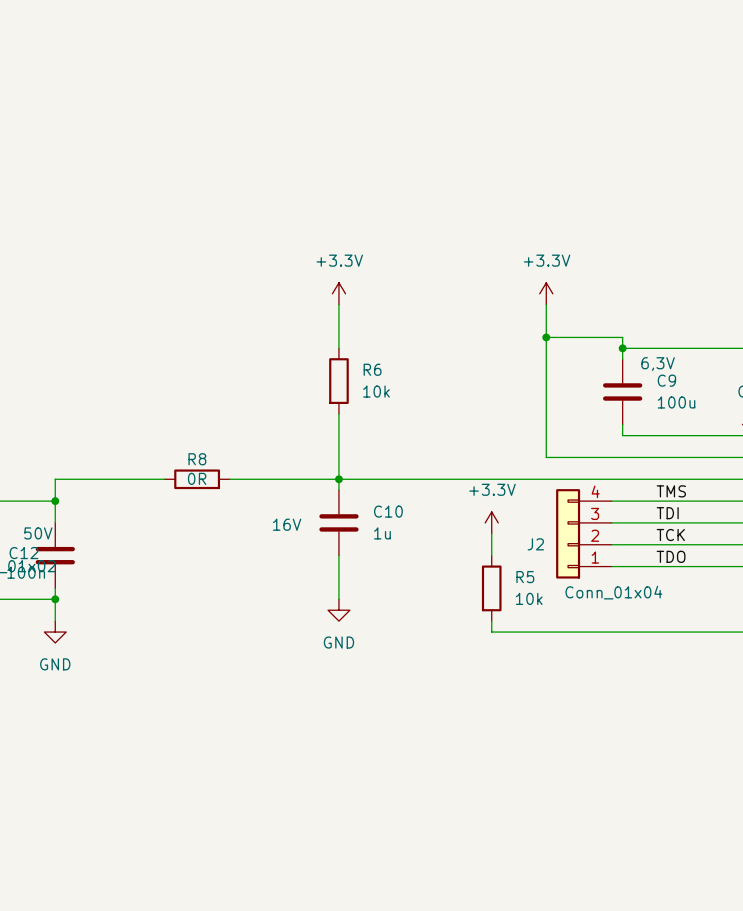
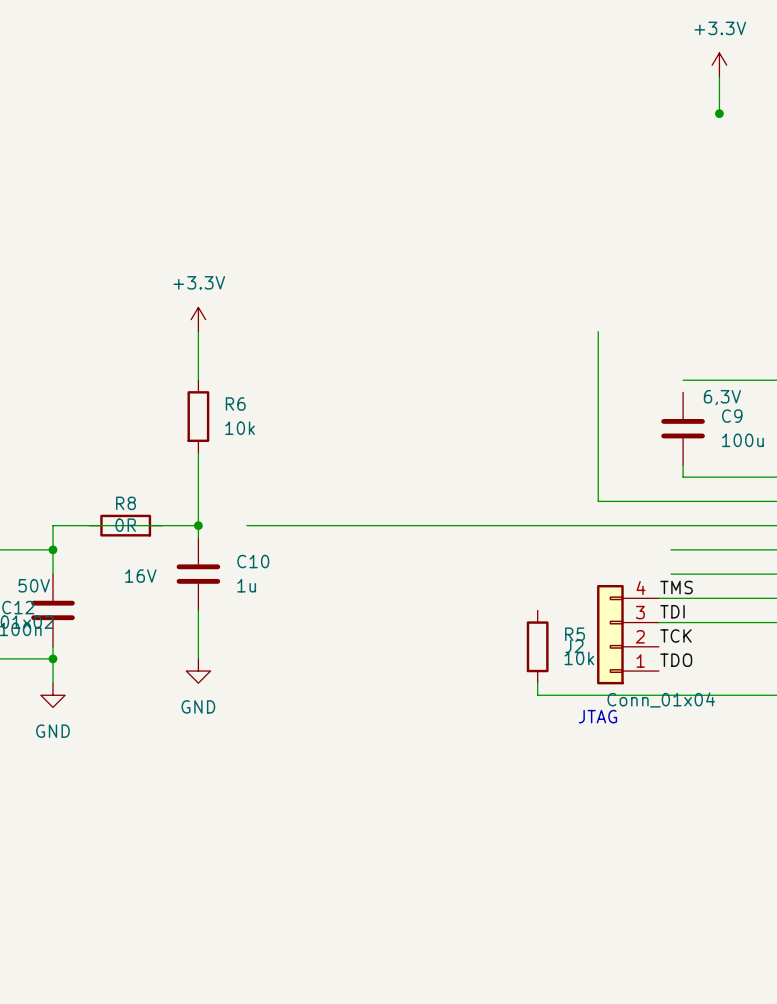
power symbol: none -> +3.3V (719, 65)
wire: none -> (719, 77) (719, 113)
junction: none -> (719, 113)
power symbol position: +3.3V (338, 293) -> +3.3V (198, 319)
power symbol: +3.3V (546, 293) -> none
wire: (338, 304) (338, 348) -> (198, 331) (198, 380)
wire: (546, 337) (622, 337) (622, 359) -> none
junction: (546, 337) -> none
junction: (622, 348) -> none
R6 position: (338, 381) -> (198, 416)
wire: (338, 413) (338, 490) -> (198, 452) (198, 537)
junction: none -> (198, 525)
R8 position: (197, 479) -> (125, 525)
junction: (338, 479) -> none
label position: TMS (671, 491) -> TMS (676, 587)
label position: TDI (667, 513) -> TDI (672, 611)
C10 position: (338, 522) -> (198, 574)
power symbol: +3.3V (491, 522) -> none
wire: (491, 533) (491, 555) -> none
J2 position: (583, 533) -> (627, 634)
label position: TCK (670, 535) -> TCK (675, 635)
wire: (338, 555) (338, 599) -> (198, 610) (198, 658)
label position: TDO (671, 556) -> TDO (676, 660)
power symbol position: GND (338, 610) -> GND (198, 671)
text: none -> JTAG (597, 716)

